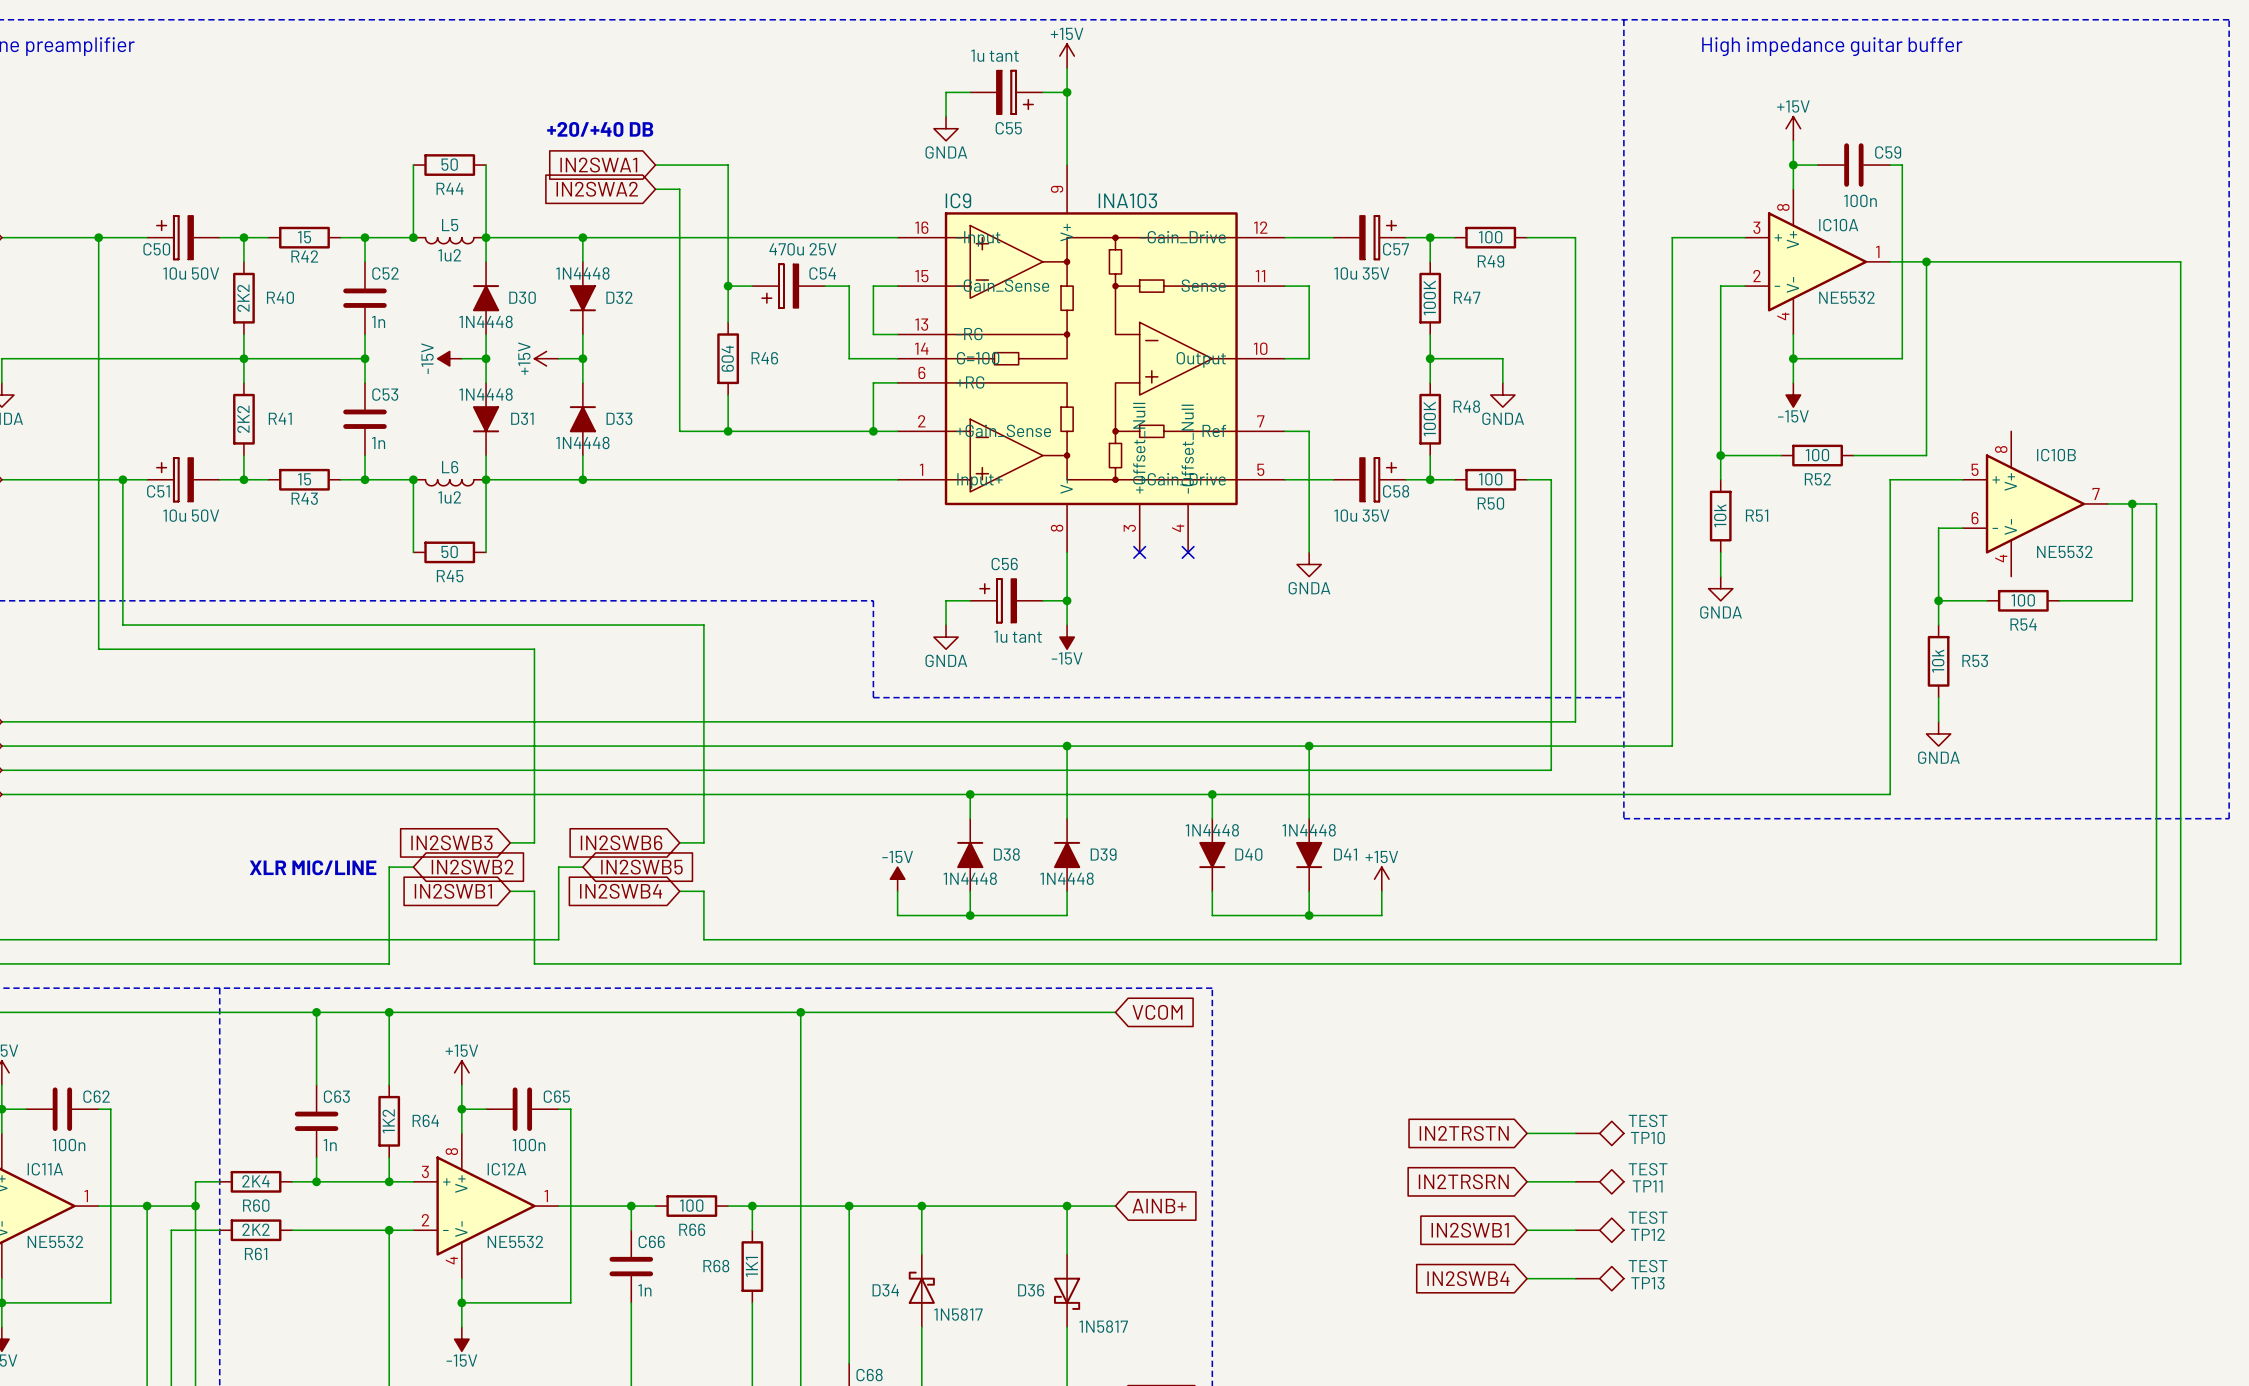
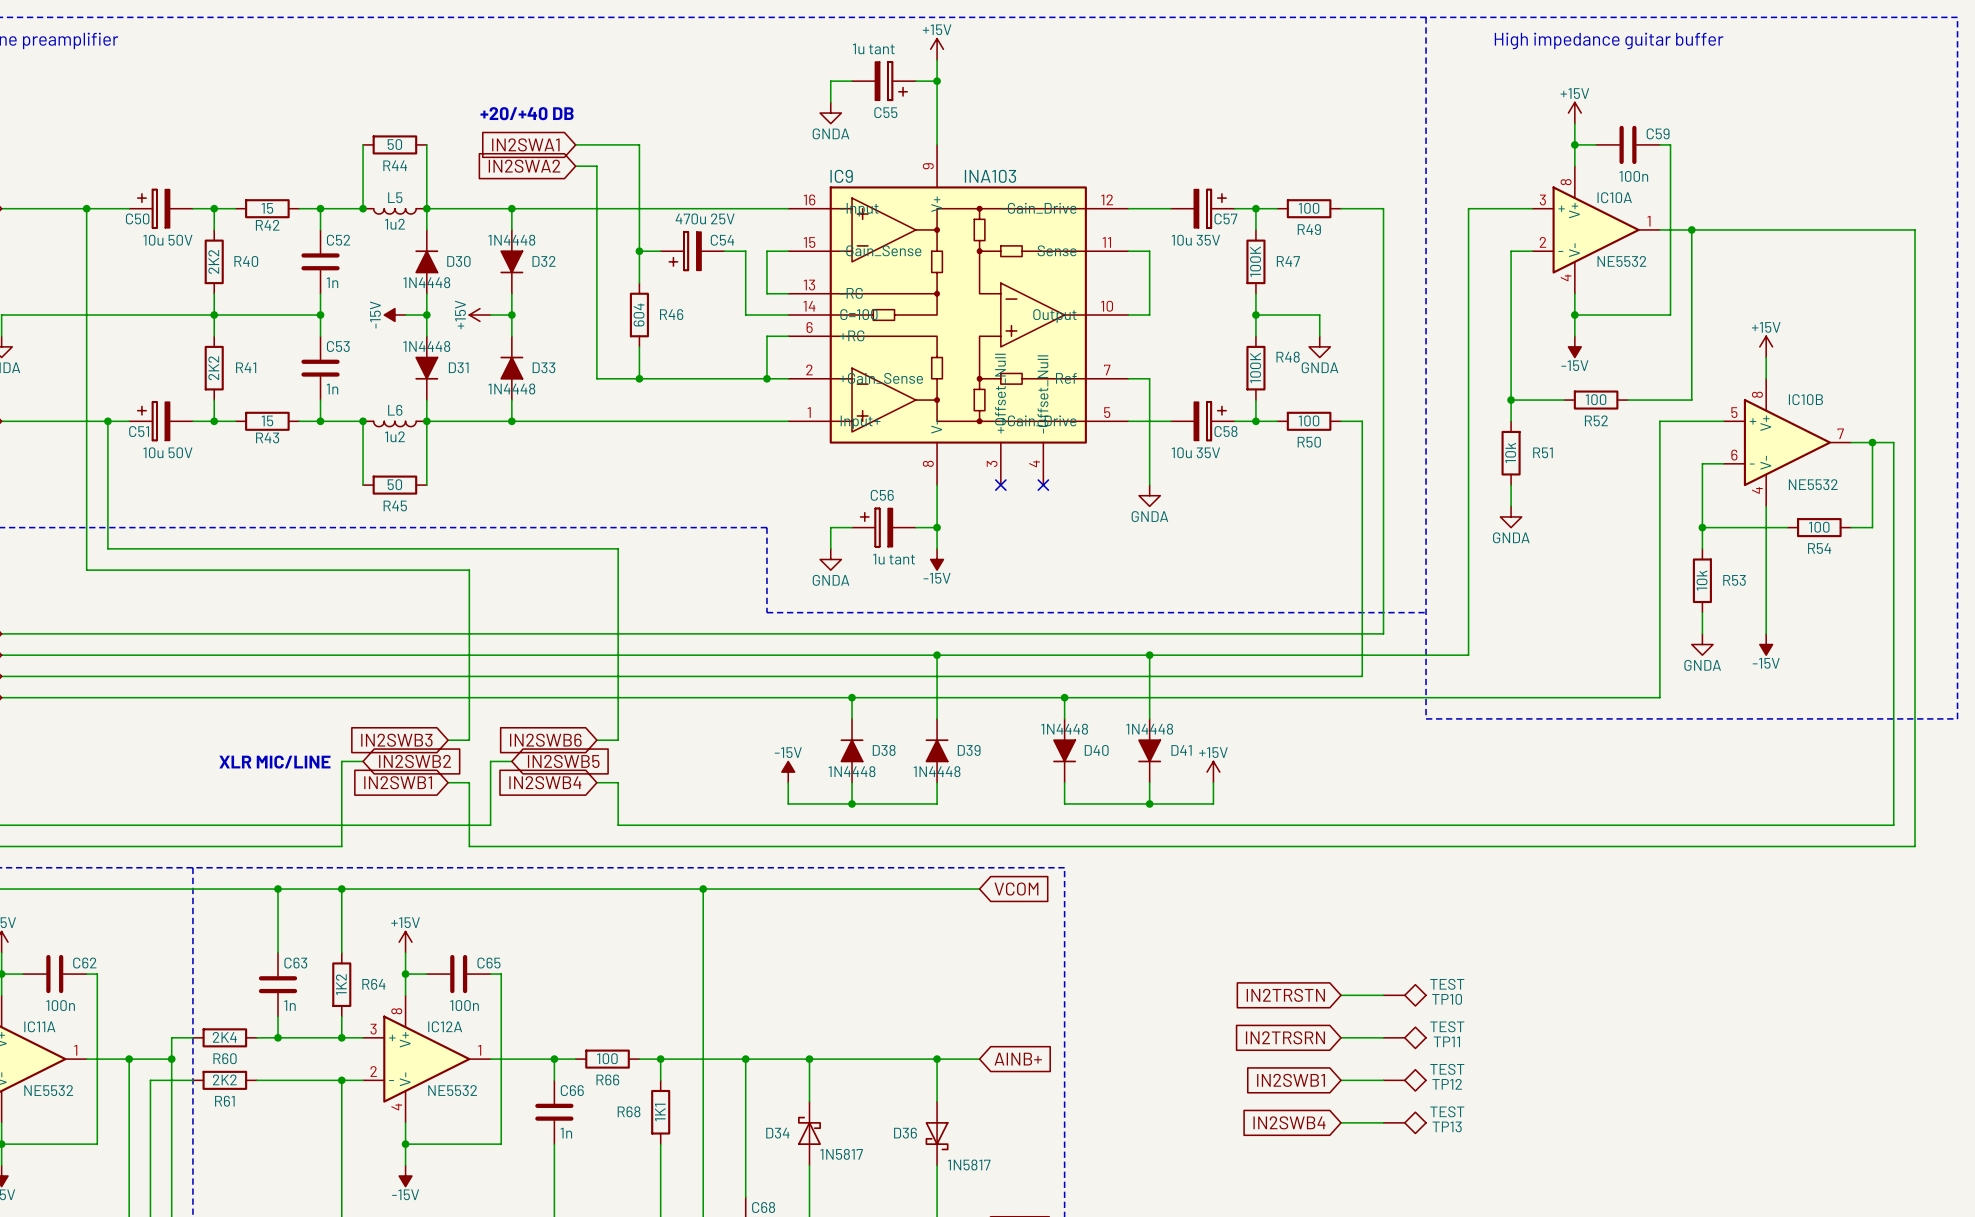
power symbol: none -> +15V (1766, 346)
wire: none -> (1766, 357) (1766, 378)
wire: none -> (1766, 506) (1766, 633)
R54 position: (2023, 600) -> (1819, 527)
wire: (2059, 600) (2108, 600) -> (1744, 527) (1787, 527)
power symbol: none -> -15V (1766, 644)

